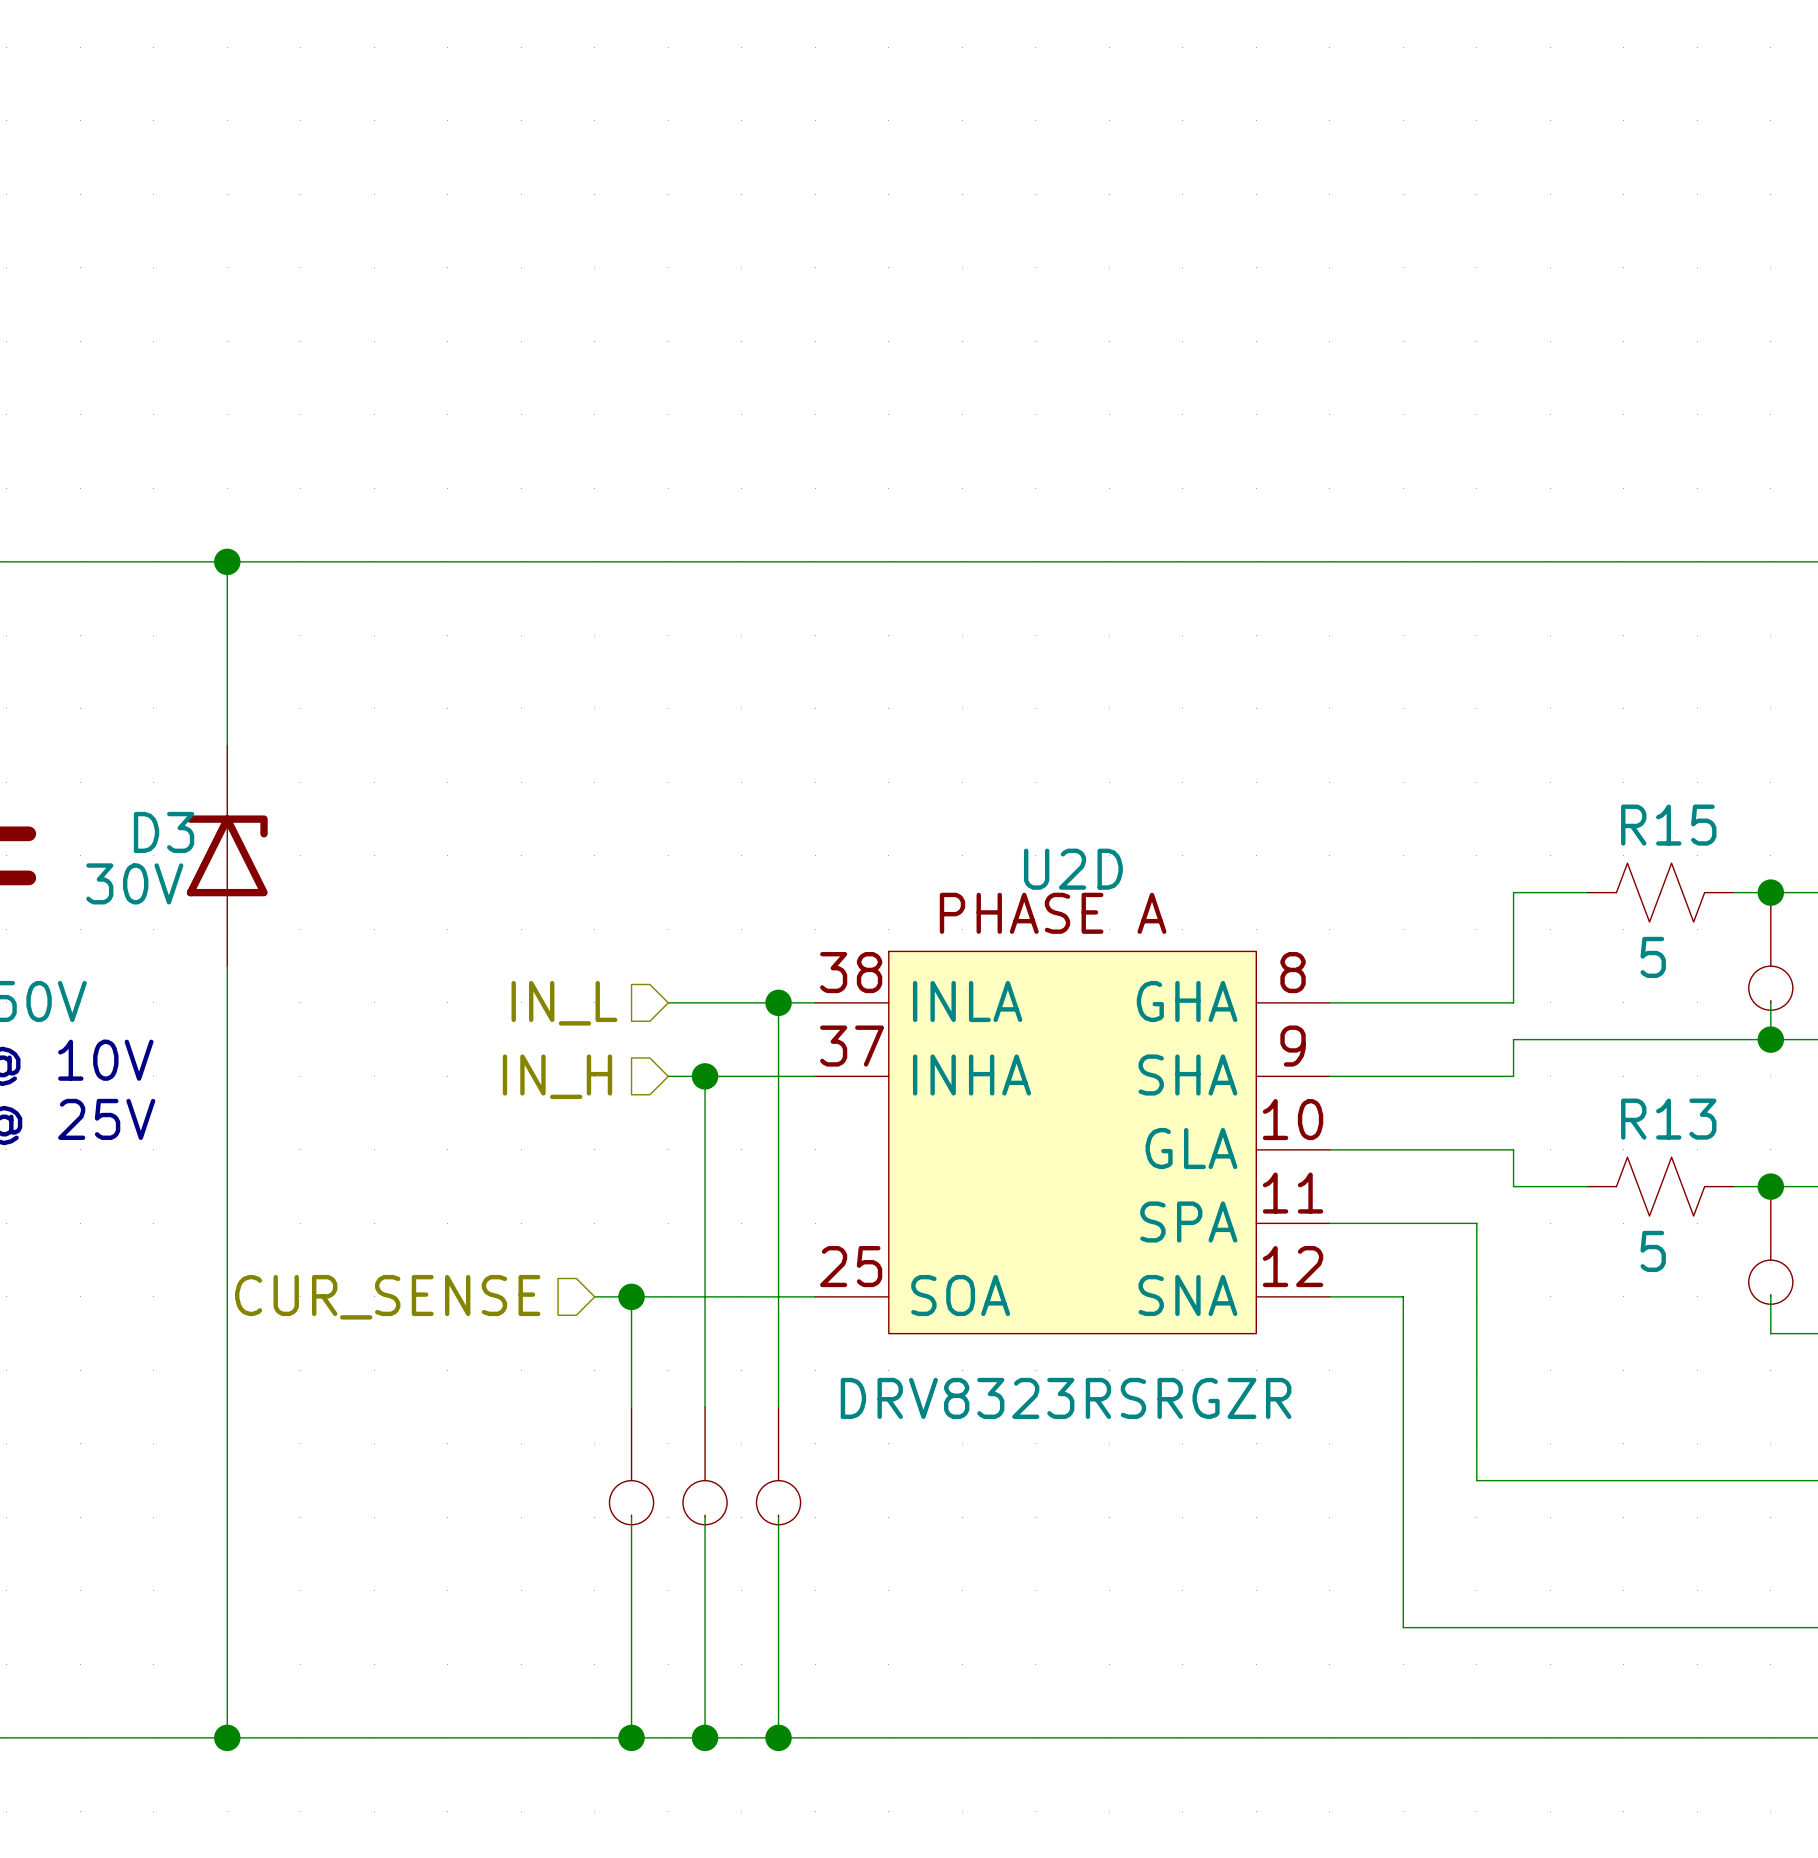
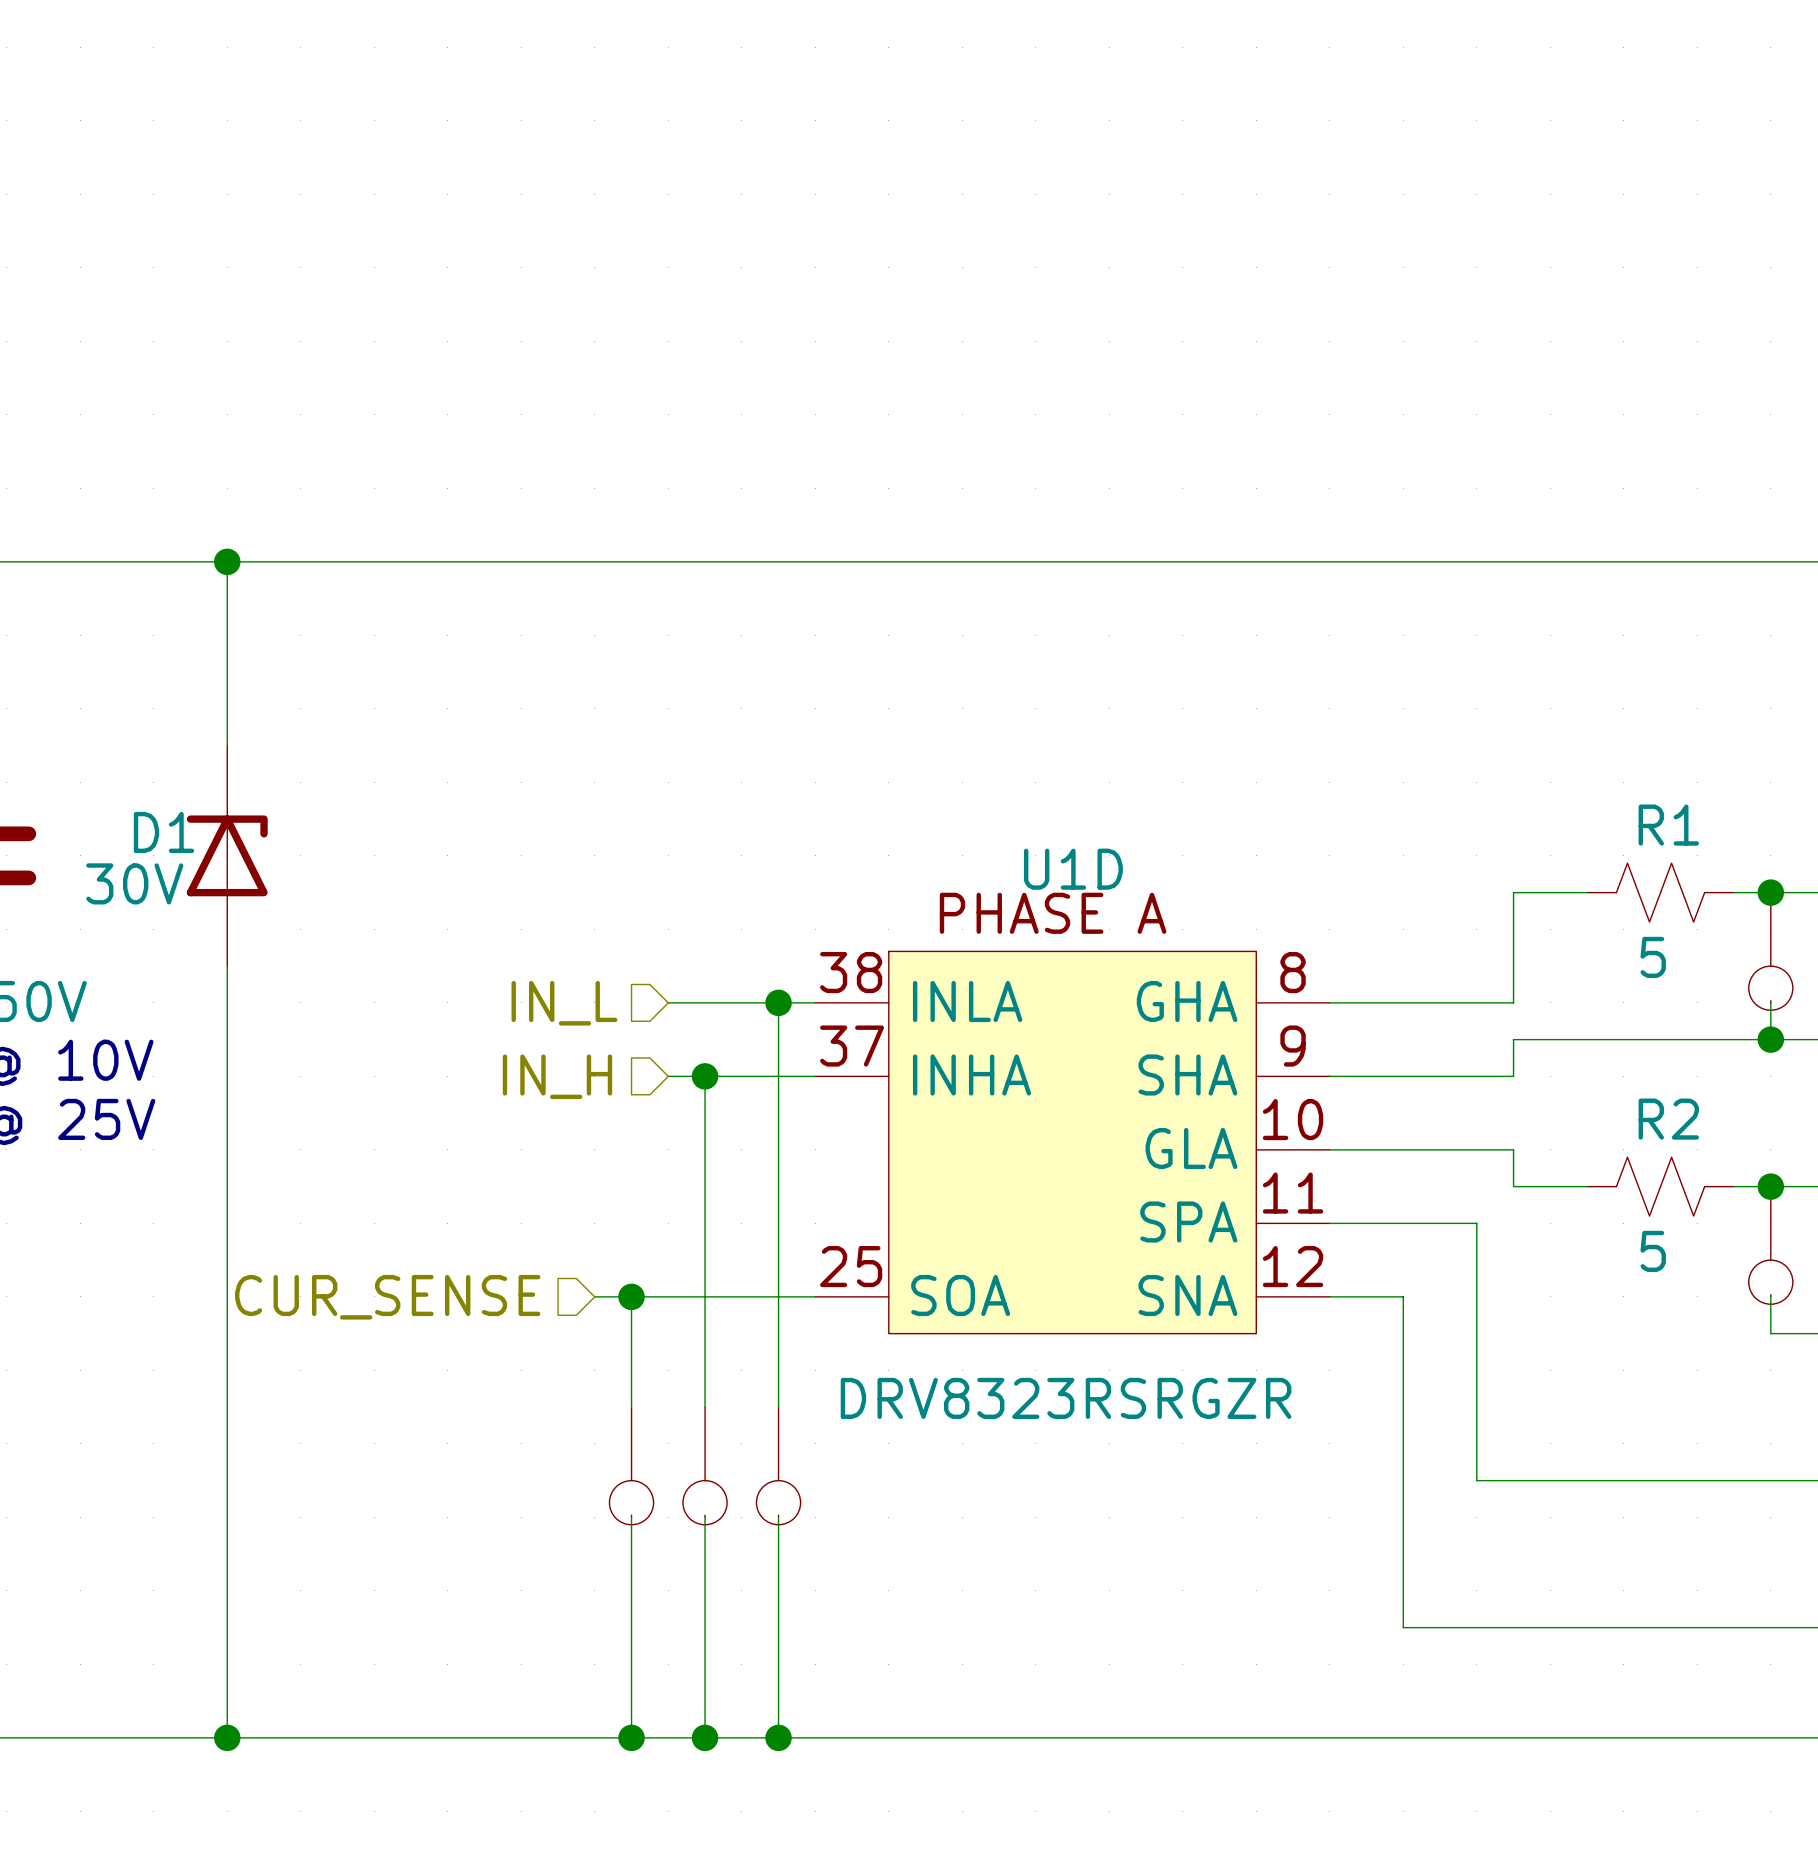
R15 name: R15 (1668, 825) -> R1 (1668, 825)
D3 name: D3 (164, 832) -> D1 (164, 832)
U2D name: U2D (1073, 869) -> U1D (1073, 869)
R13 name: R13 (1668, 1119) -> R2 (1668, 1119)

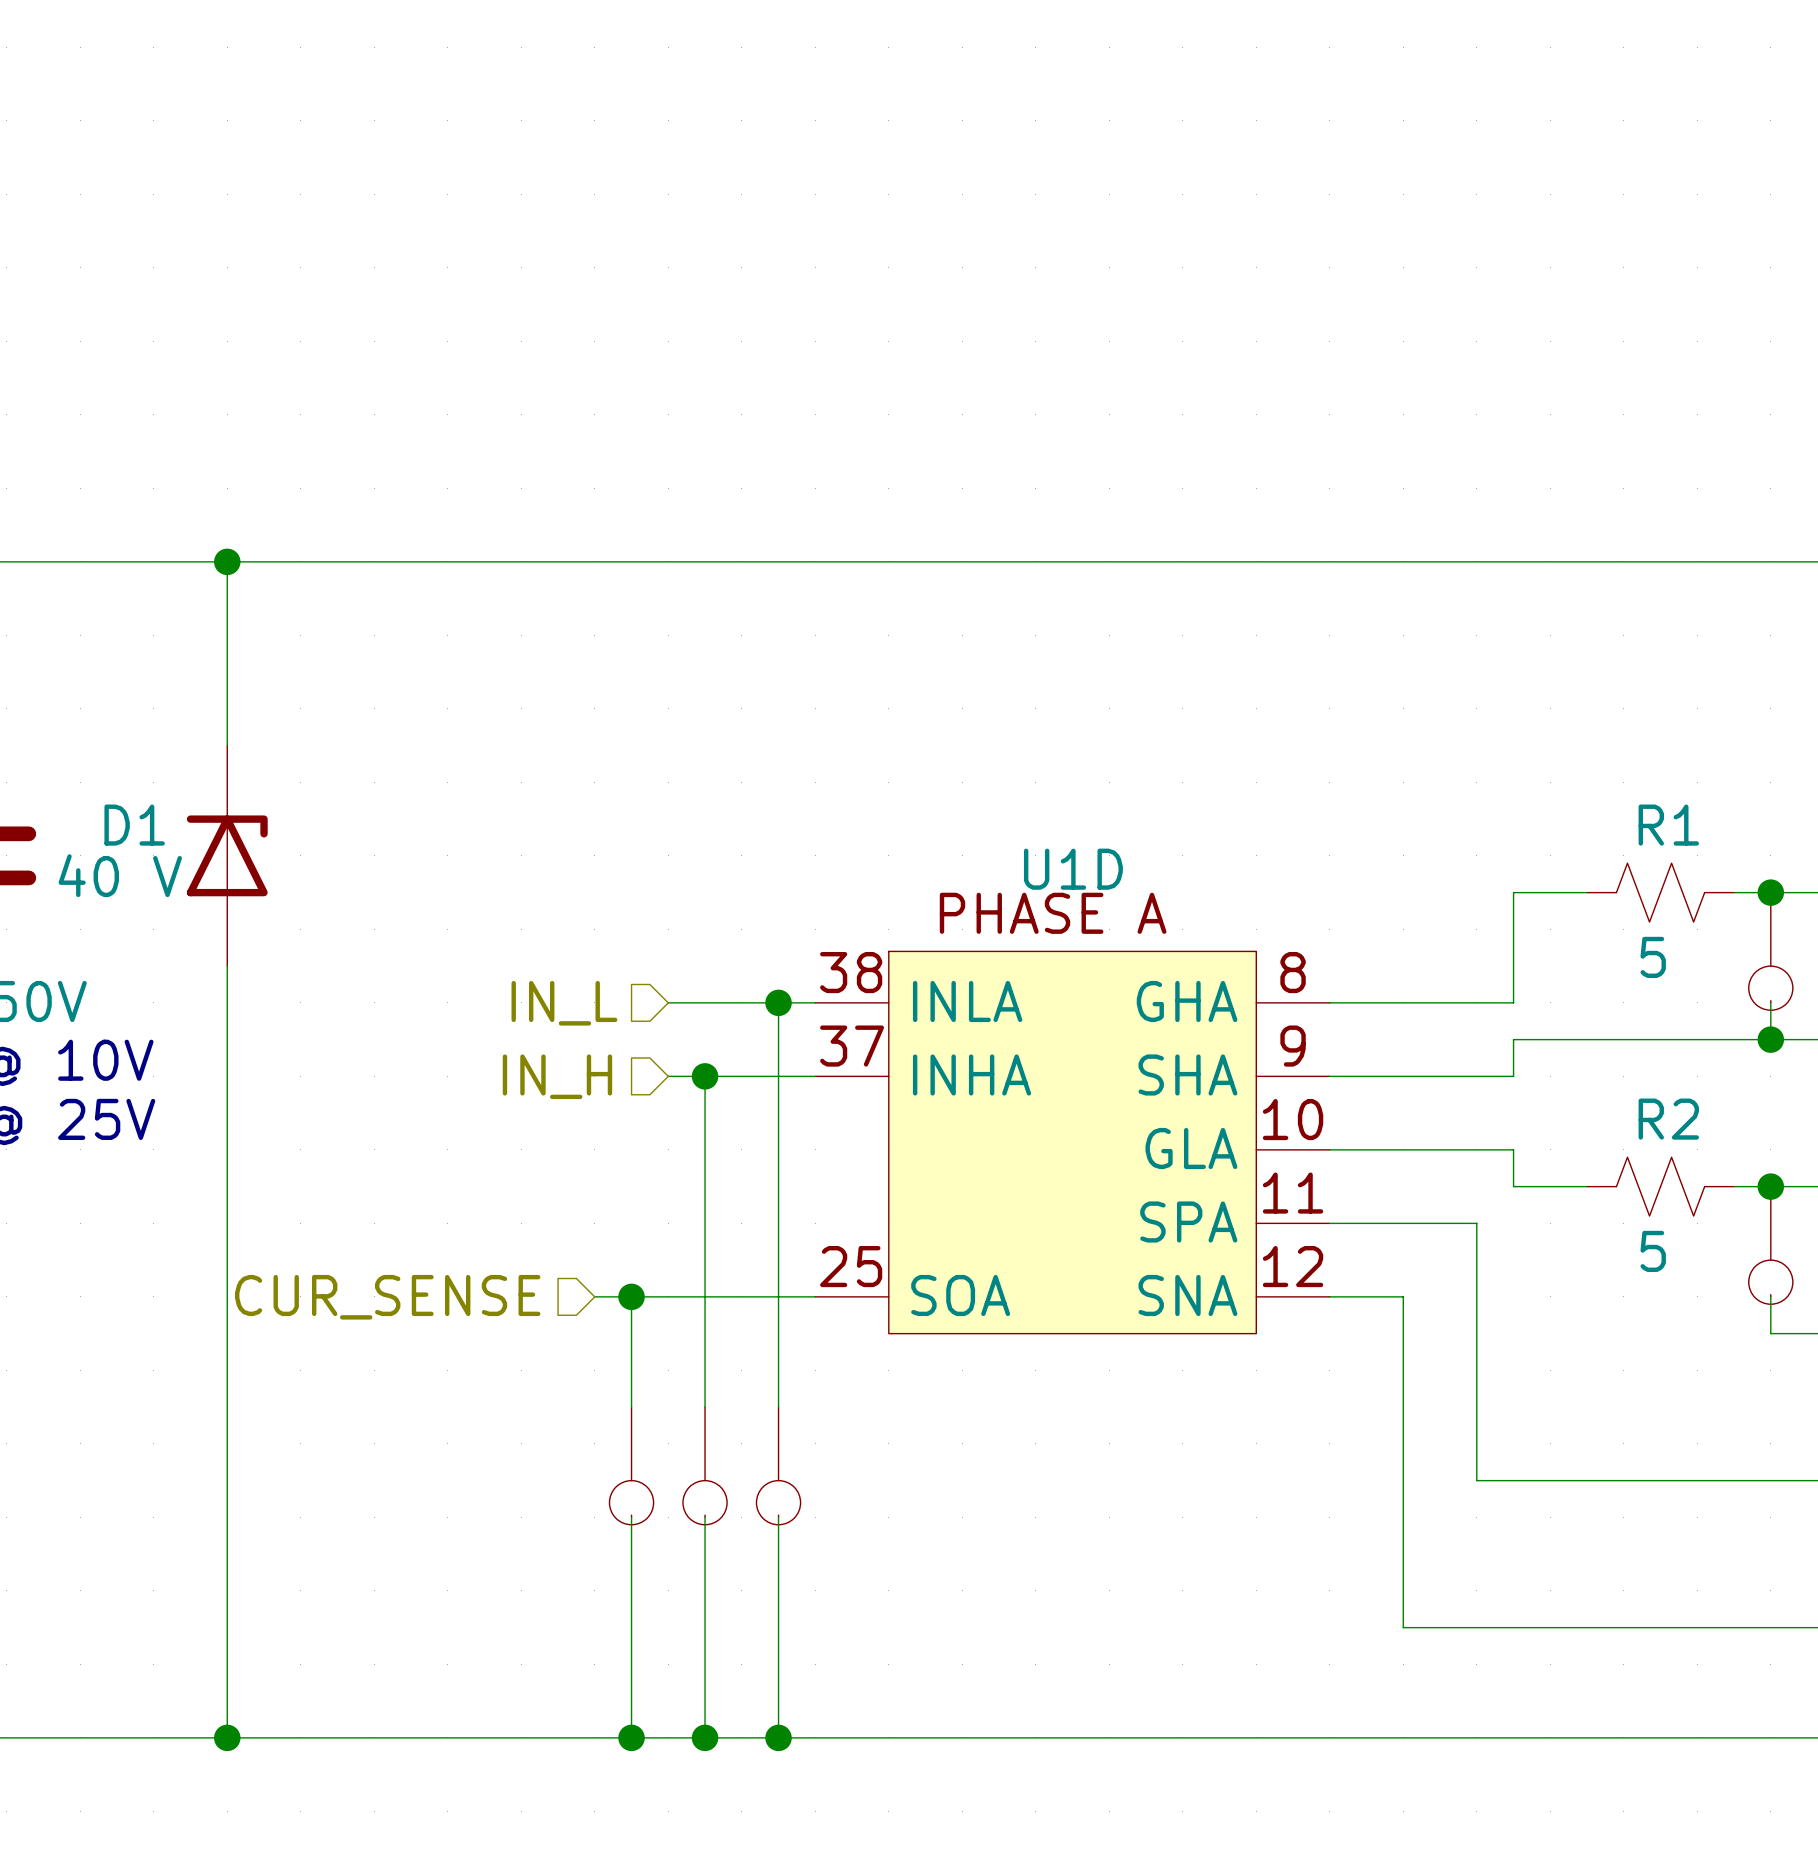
D1 name position: D1 (164, 832) -> D1 (134, 825)
D1 value: 30V (134, 883) -> 40 V (120, 875)
U1D text: DRV8323RSRGZR (1066, 1398) -> none

